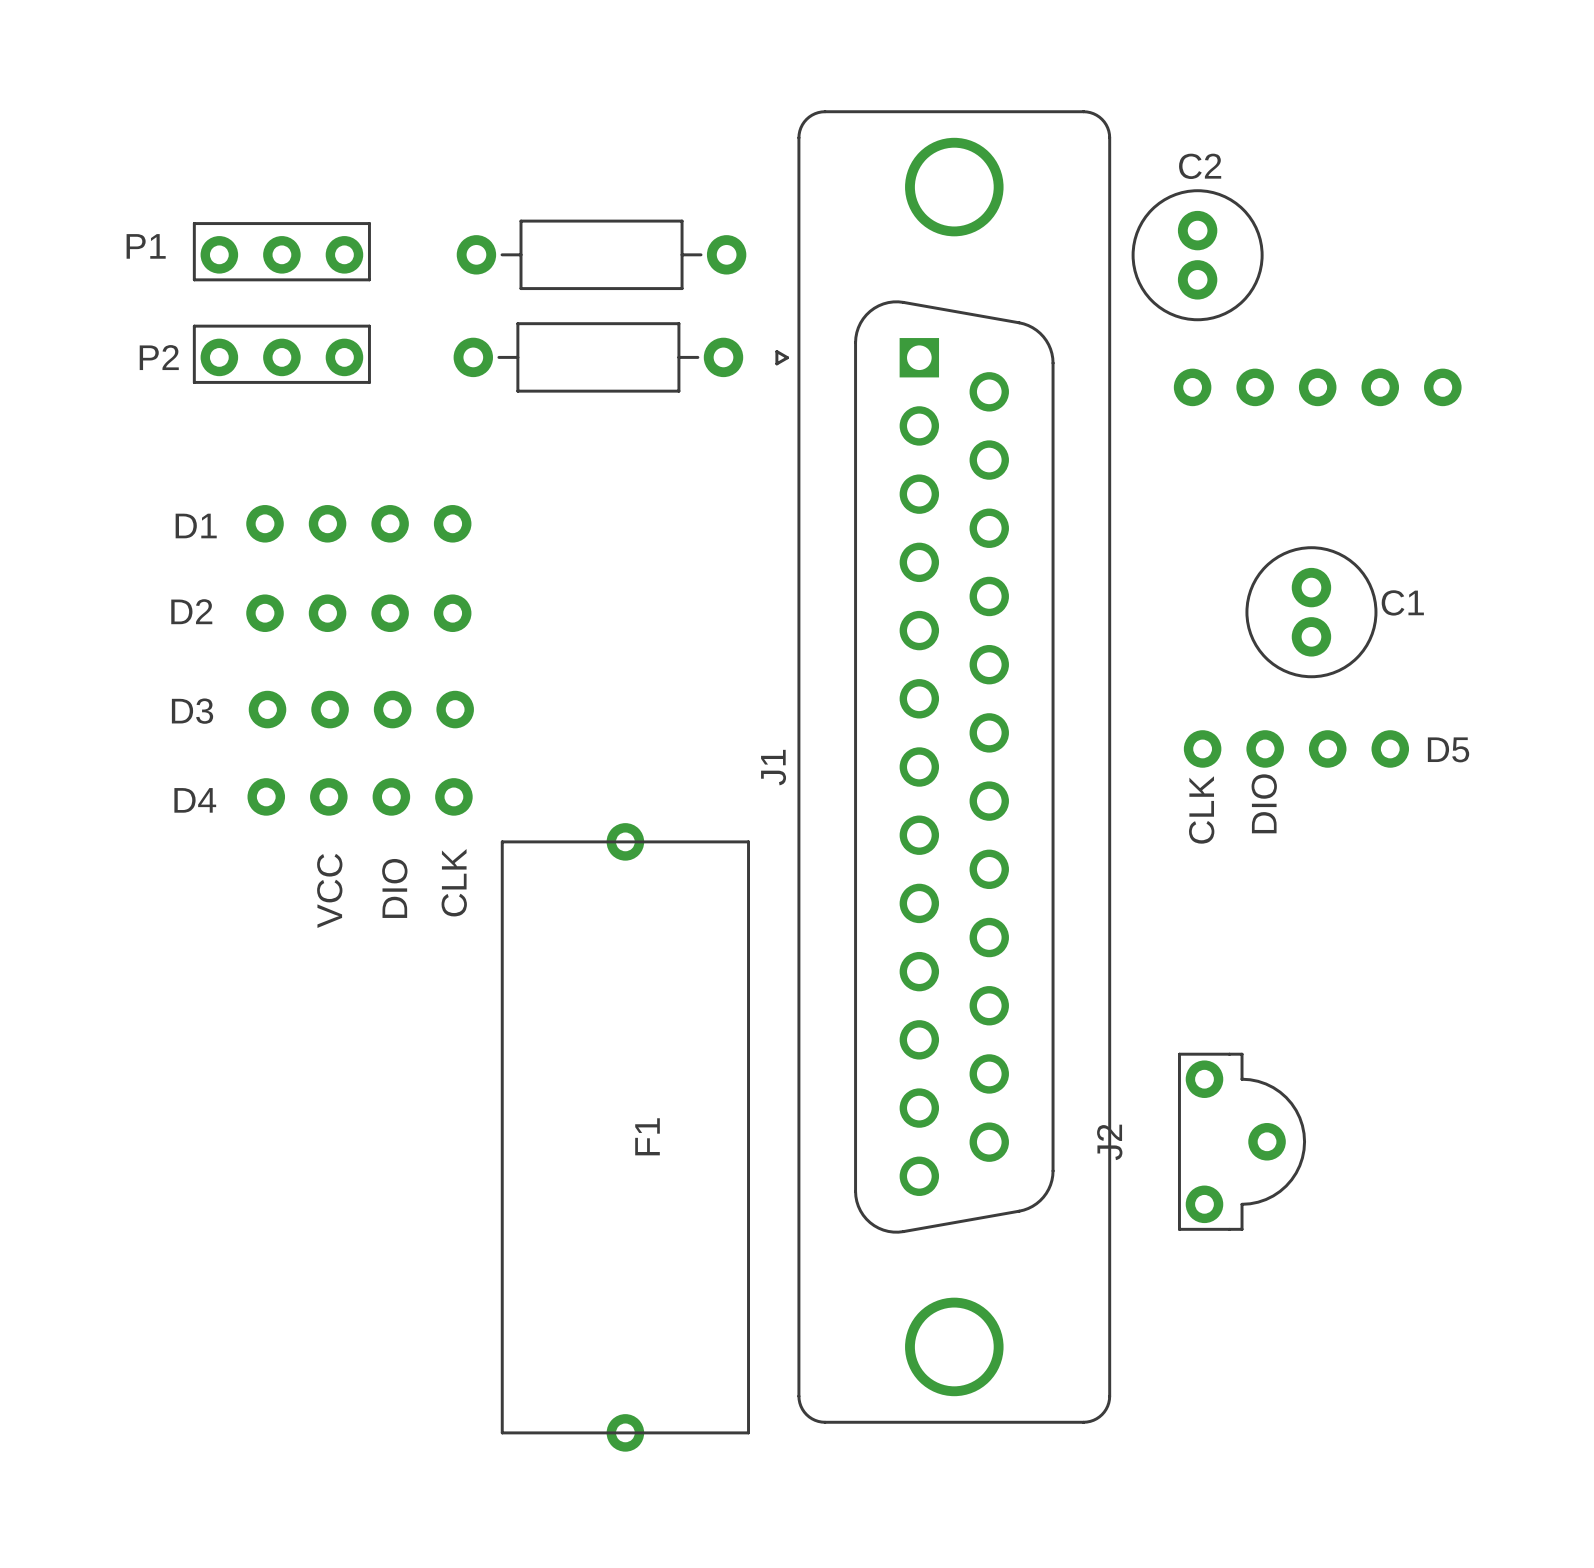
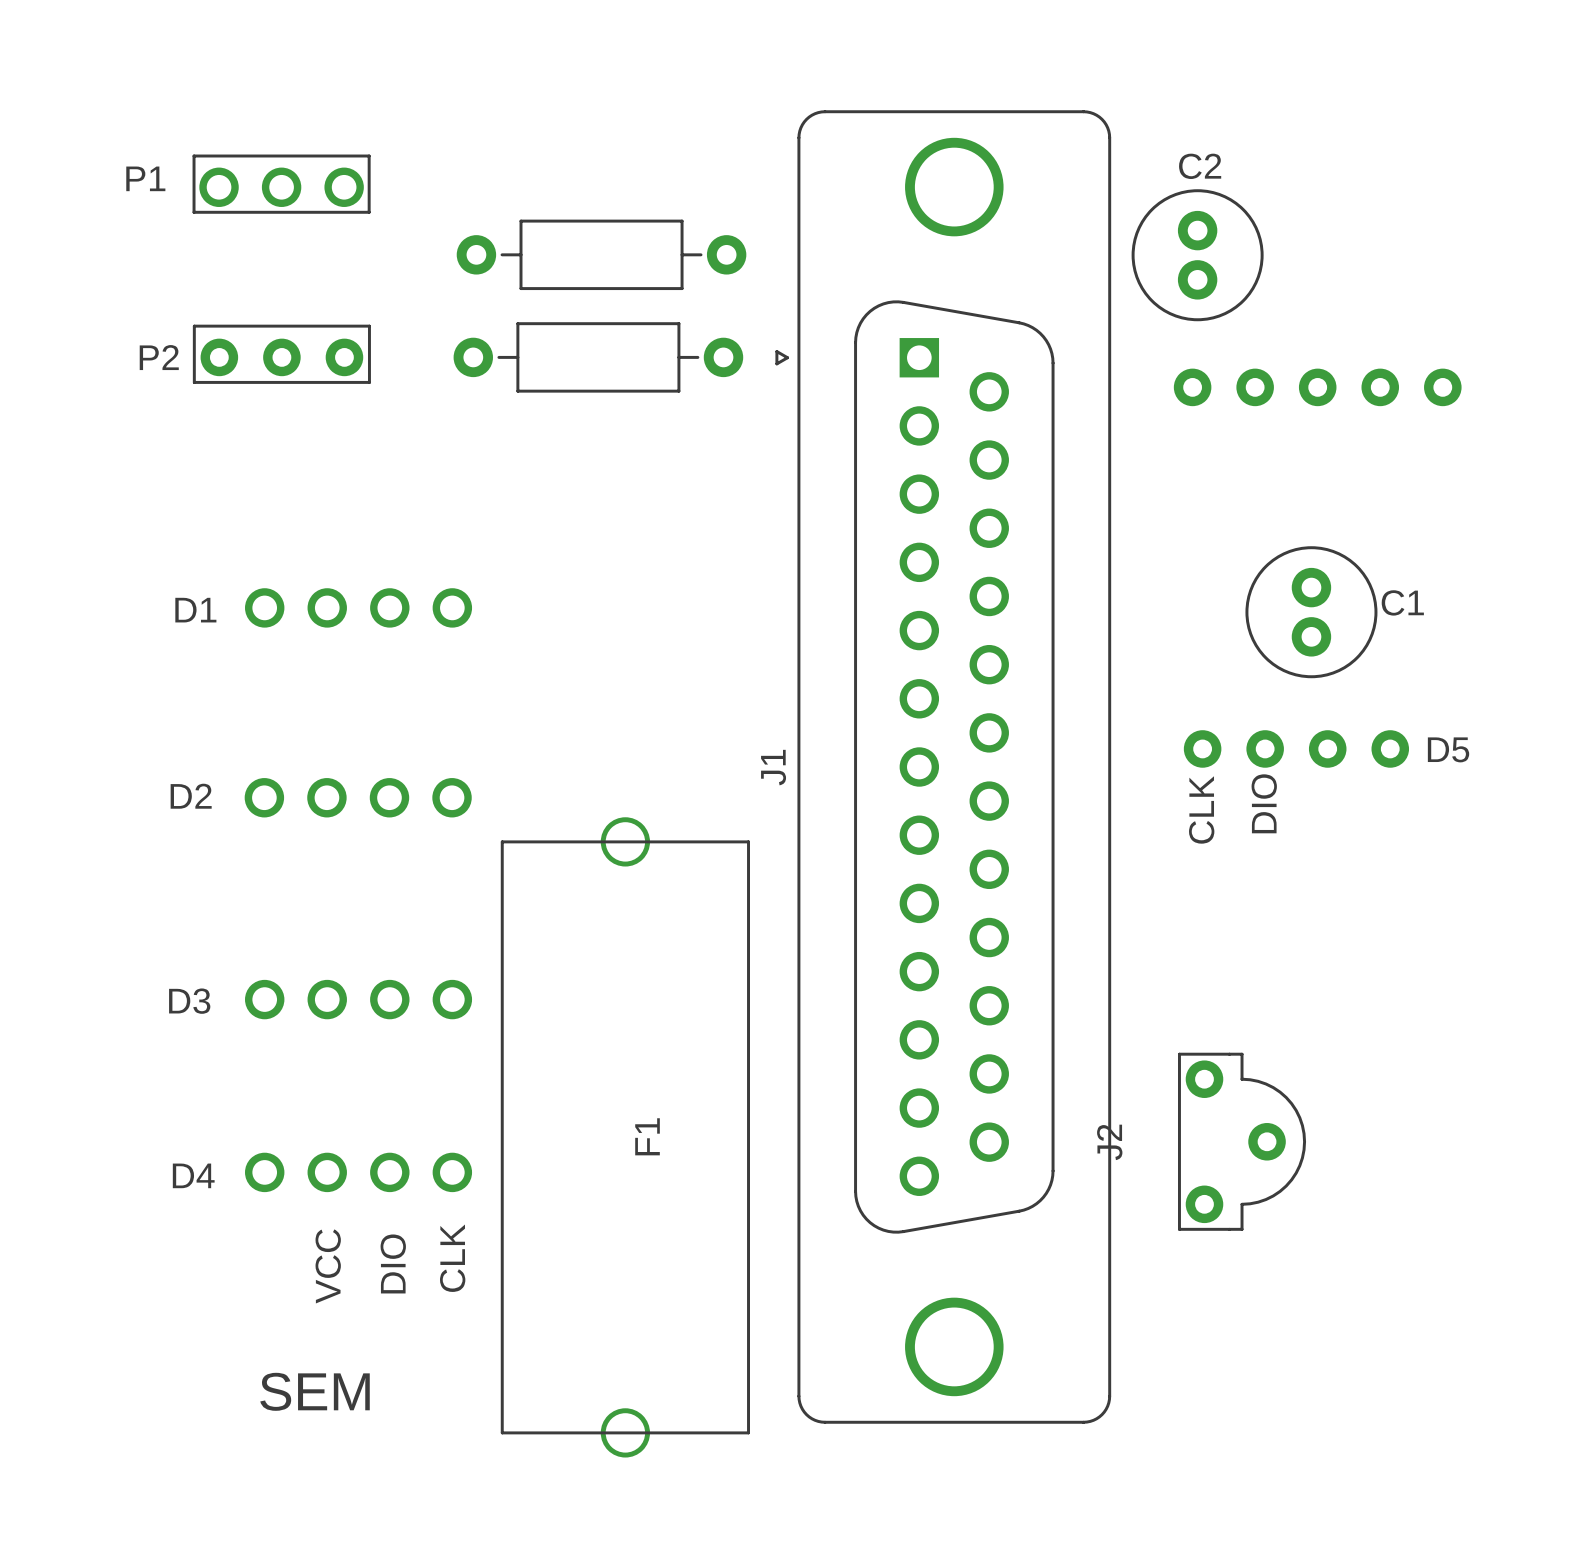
P1 footprint: [192, 222, 371, 282] -> [192, 154, 371, 214]
D1 footprint: [246, 505, 472, 543] -> [245, 588, 473, 628]
D2 footprint: [246, 594, 472, 633] -> [244, 778, 472, 818]
D3 footprint: [248, 690, 474, 729] -> [245, 979, 473, 1020]
D4 footprint: [247, 778, 473, 816] -> [245, 1152, 473, 1193]
F1 footprint: [500, 823, 750, 1452] -> [500, 817, 750, 1458]
text: none -> SEM (315, 1391)

